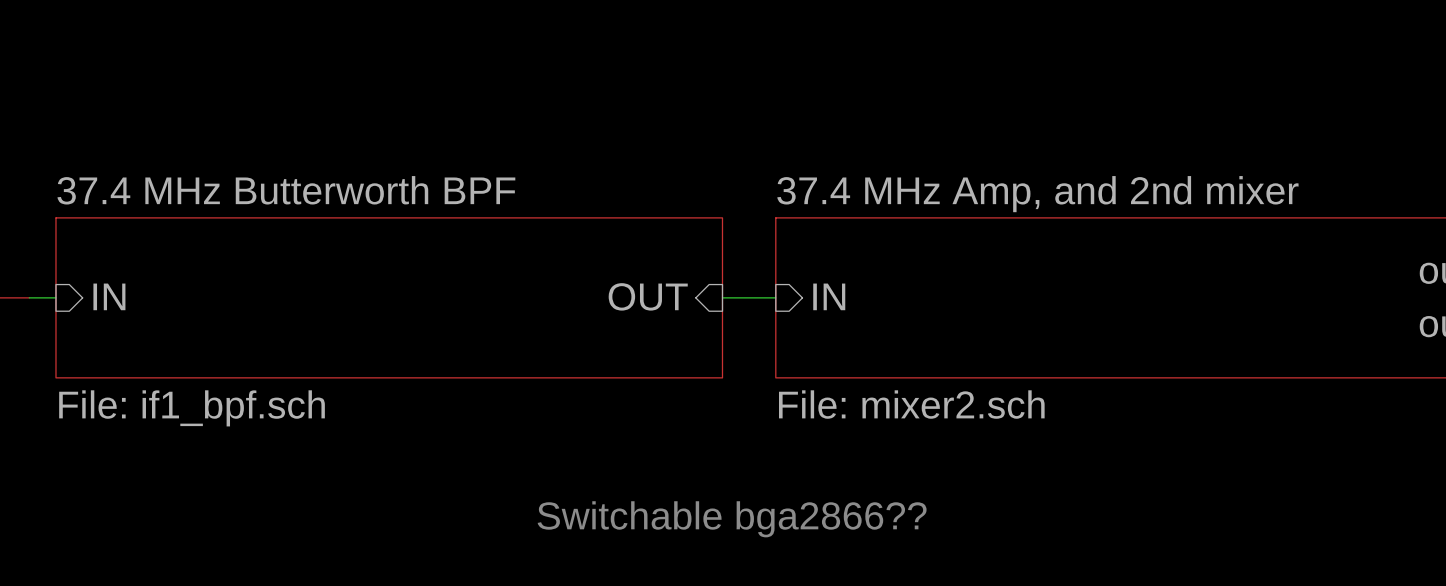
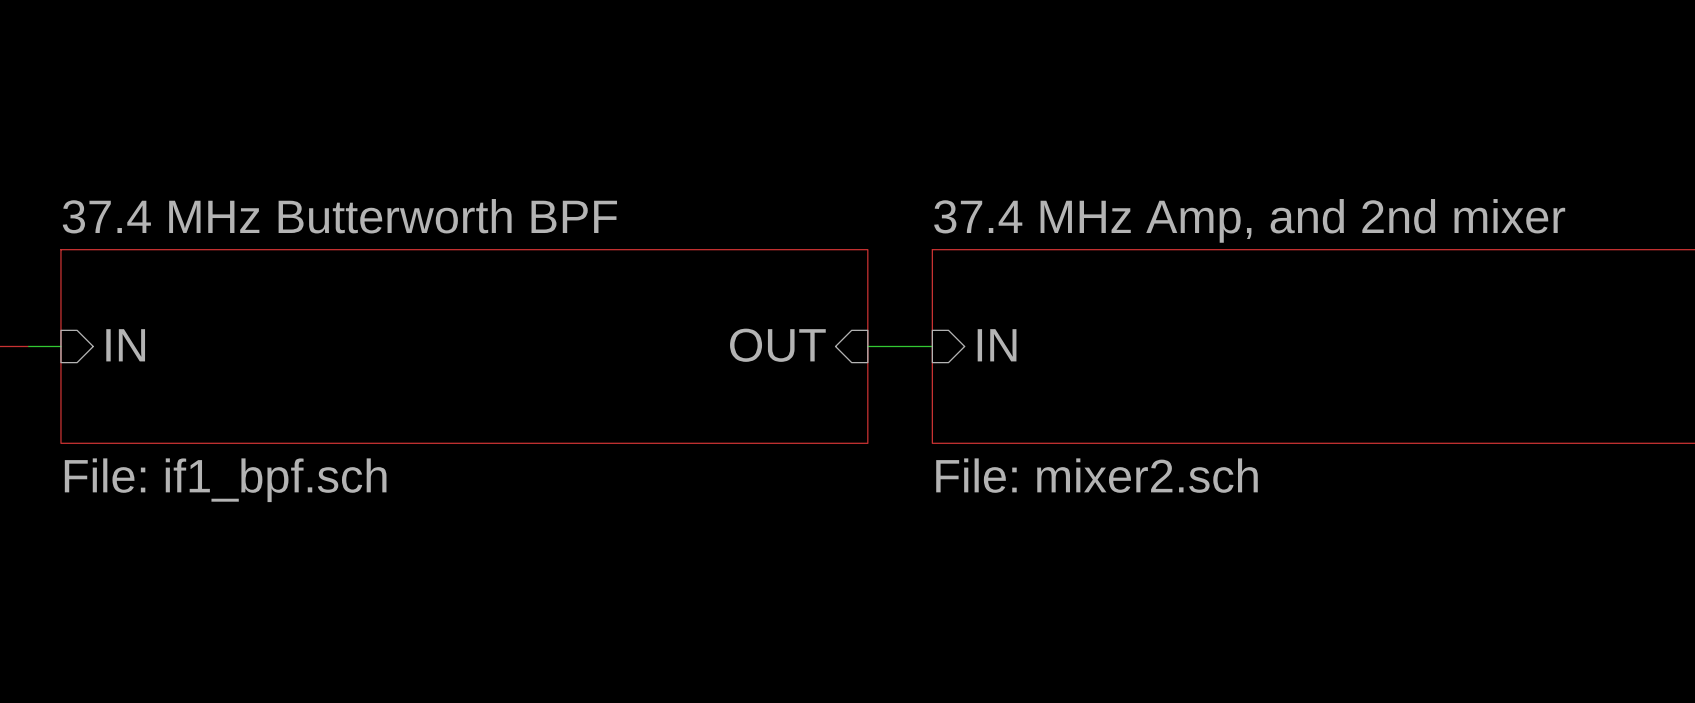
text: Switchable bga2866?? (732, 519) -> none

